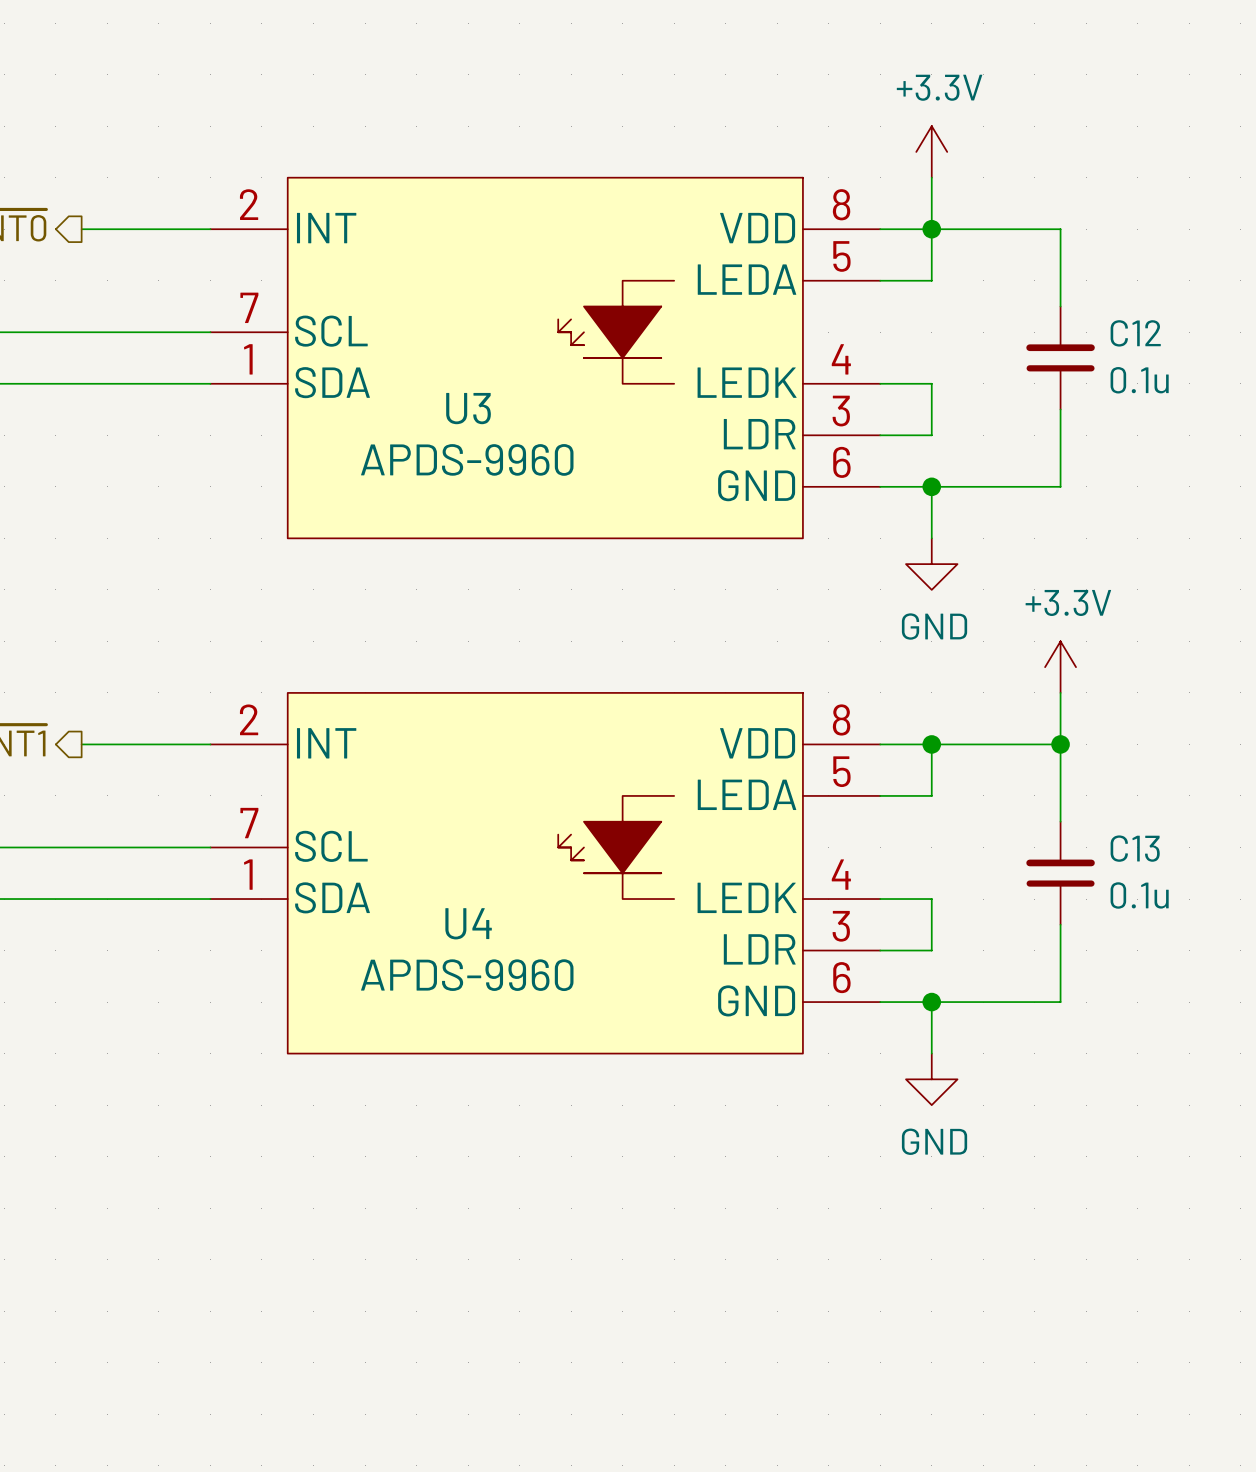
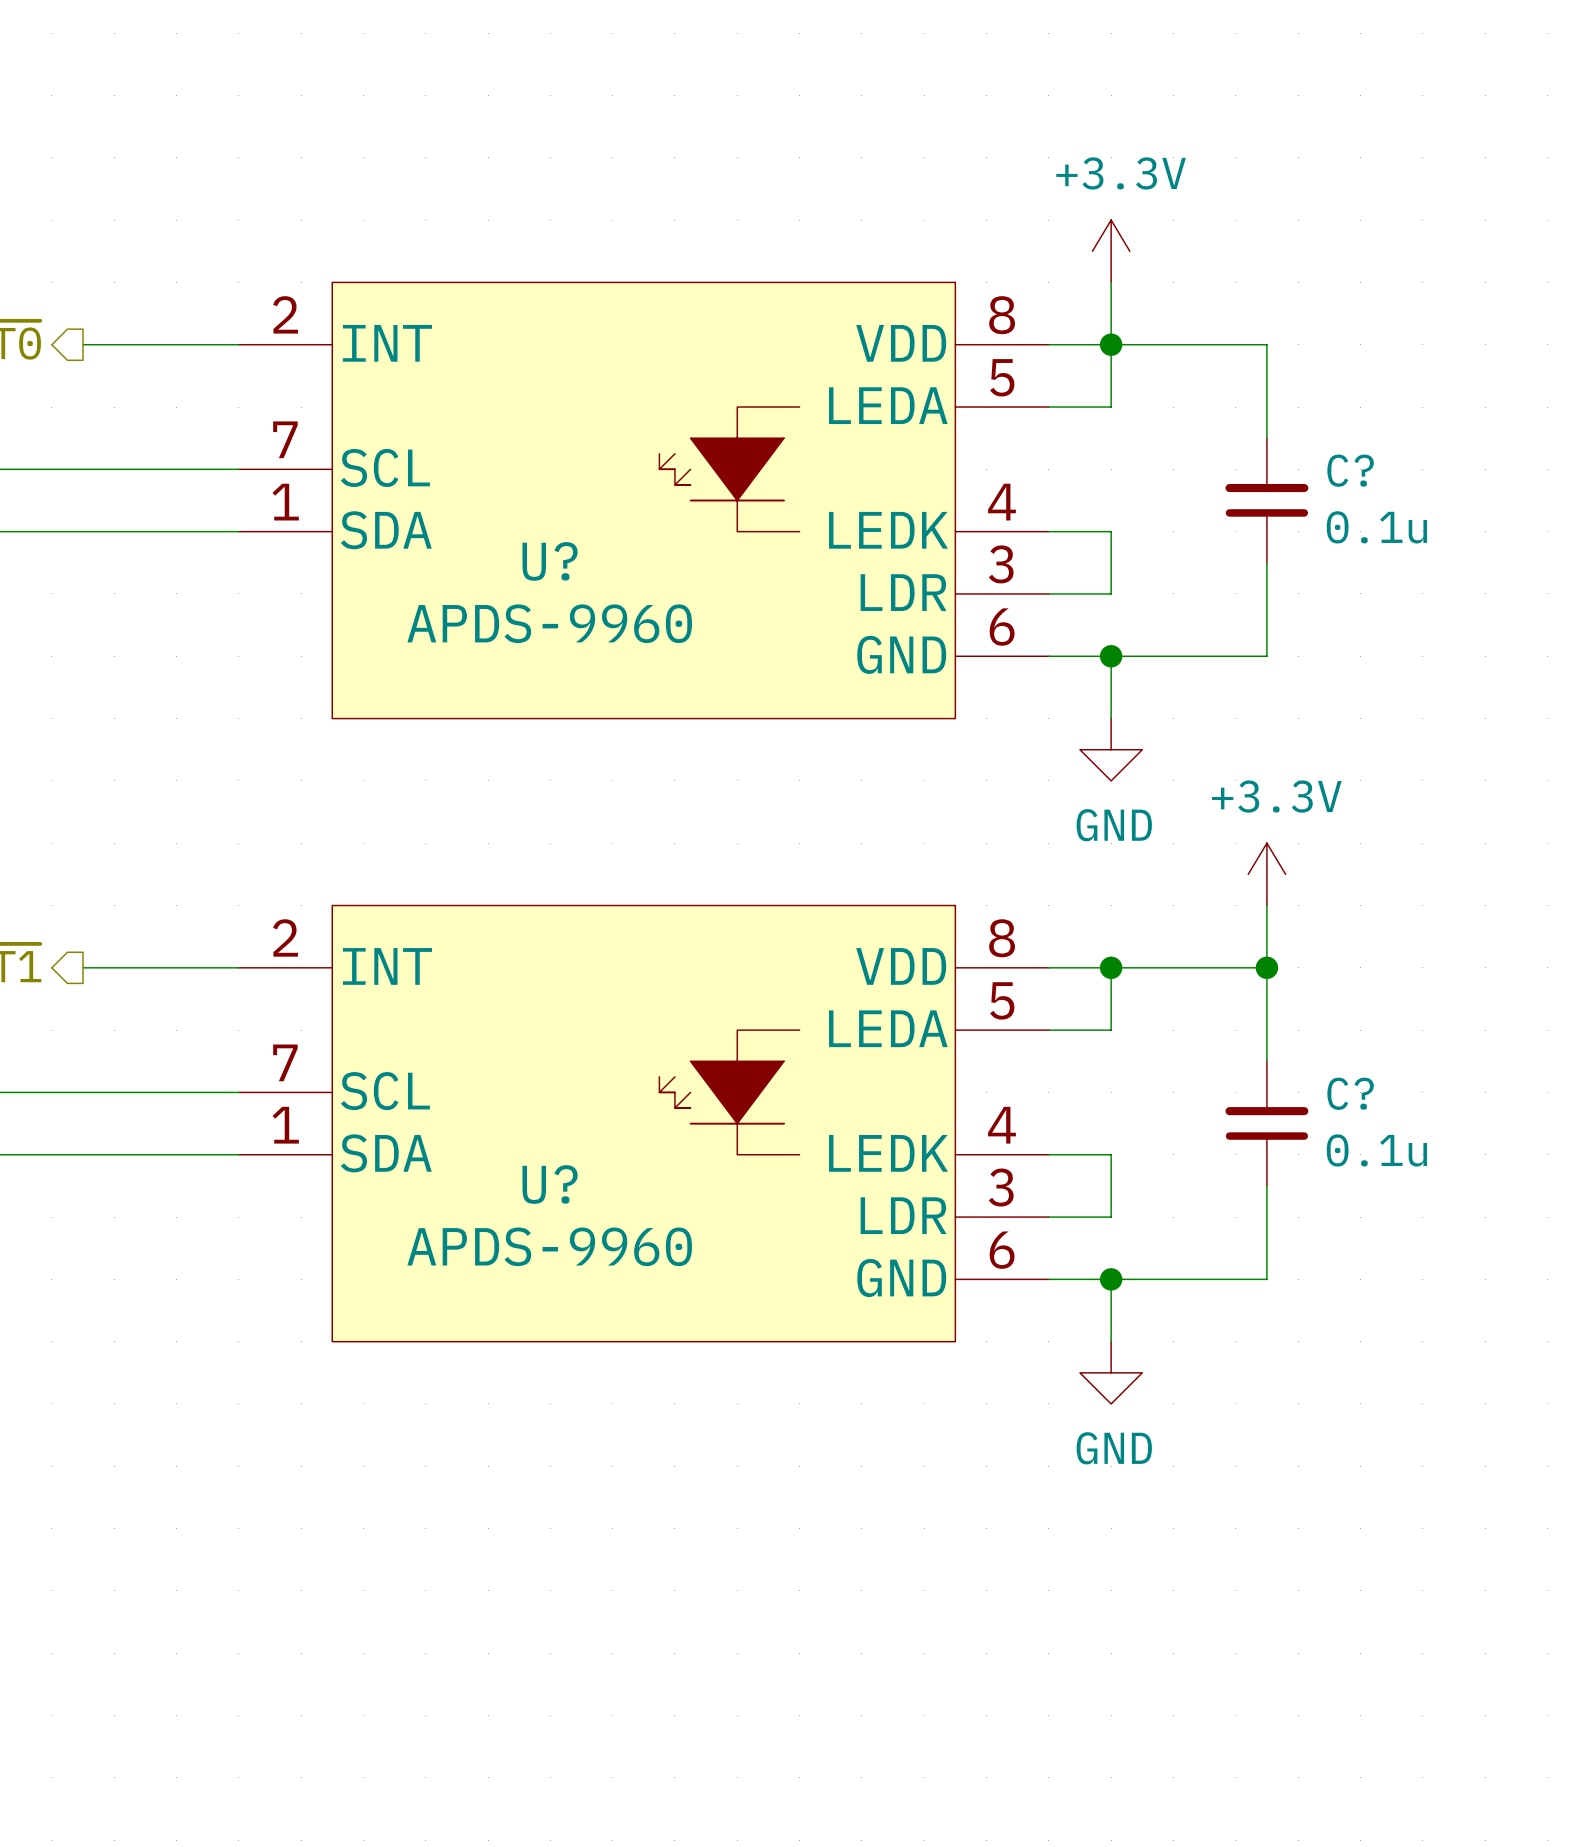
C12 name: C12 (1135, 333) -> C? (1350, 470)
U3 name: U3 (468, 408) -> U? (550, 561)
C13 name: C13 (1135, 848) -> C? (1350, 1093)
U4 name: U4 (468, 923) -> U? (550, 1184)

